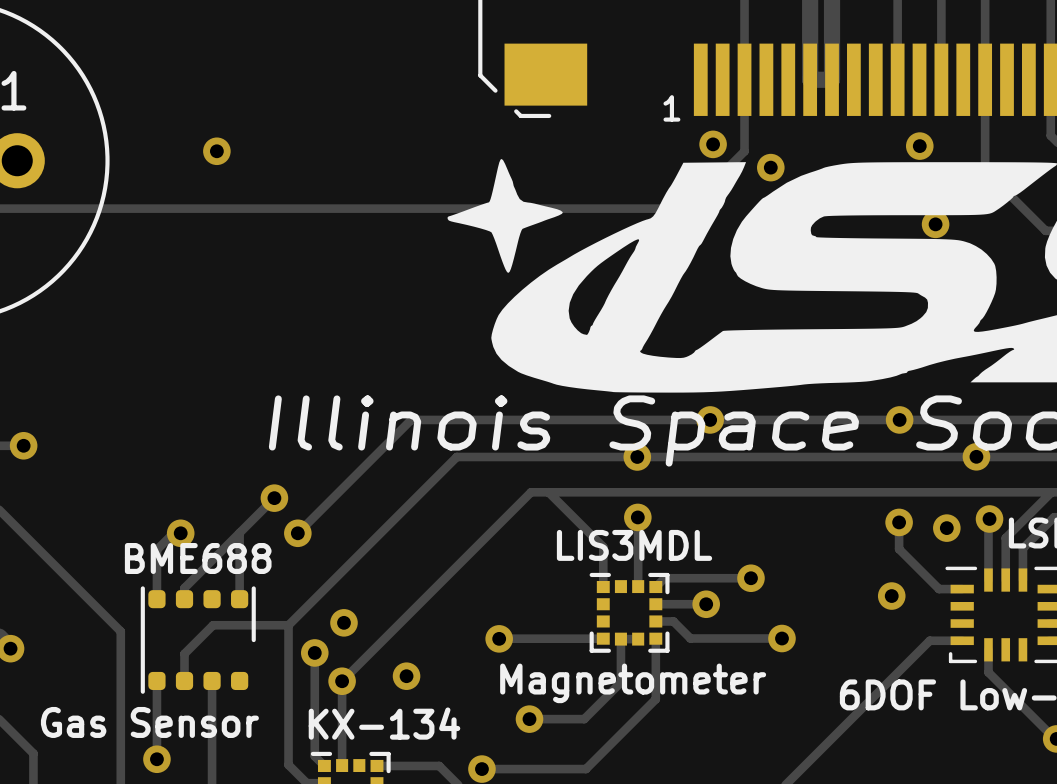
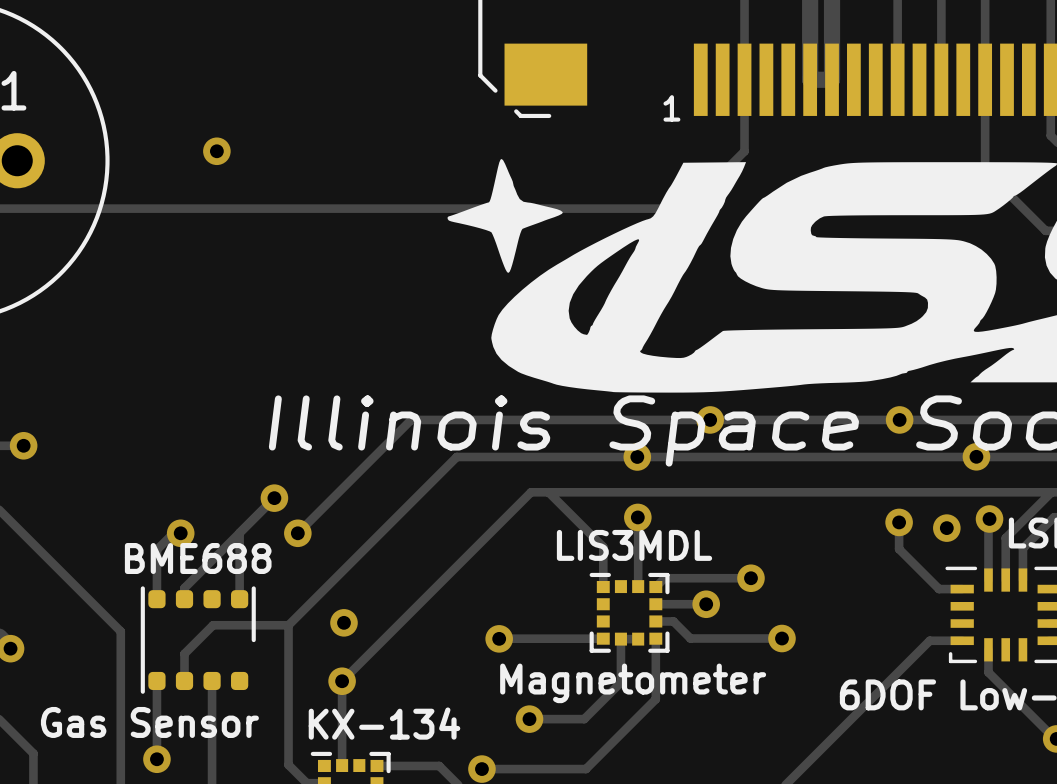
via: (713, 144) -> none
via: (919, 146) -> none
via: (770, 167) -> none
via: (935, 224) -> none
via: (891, 596) -> none
track: (314, 652) (314, 756) (324, 765) -> none
via: (314, 652) -> none
via: (406, 676) -> none

